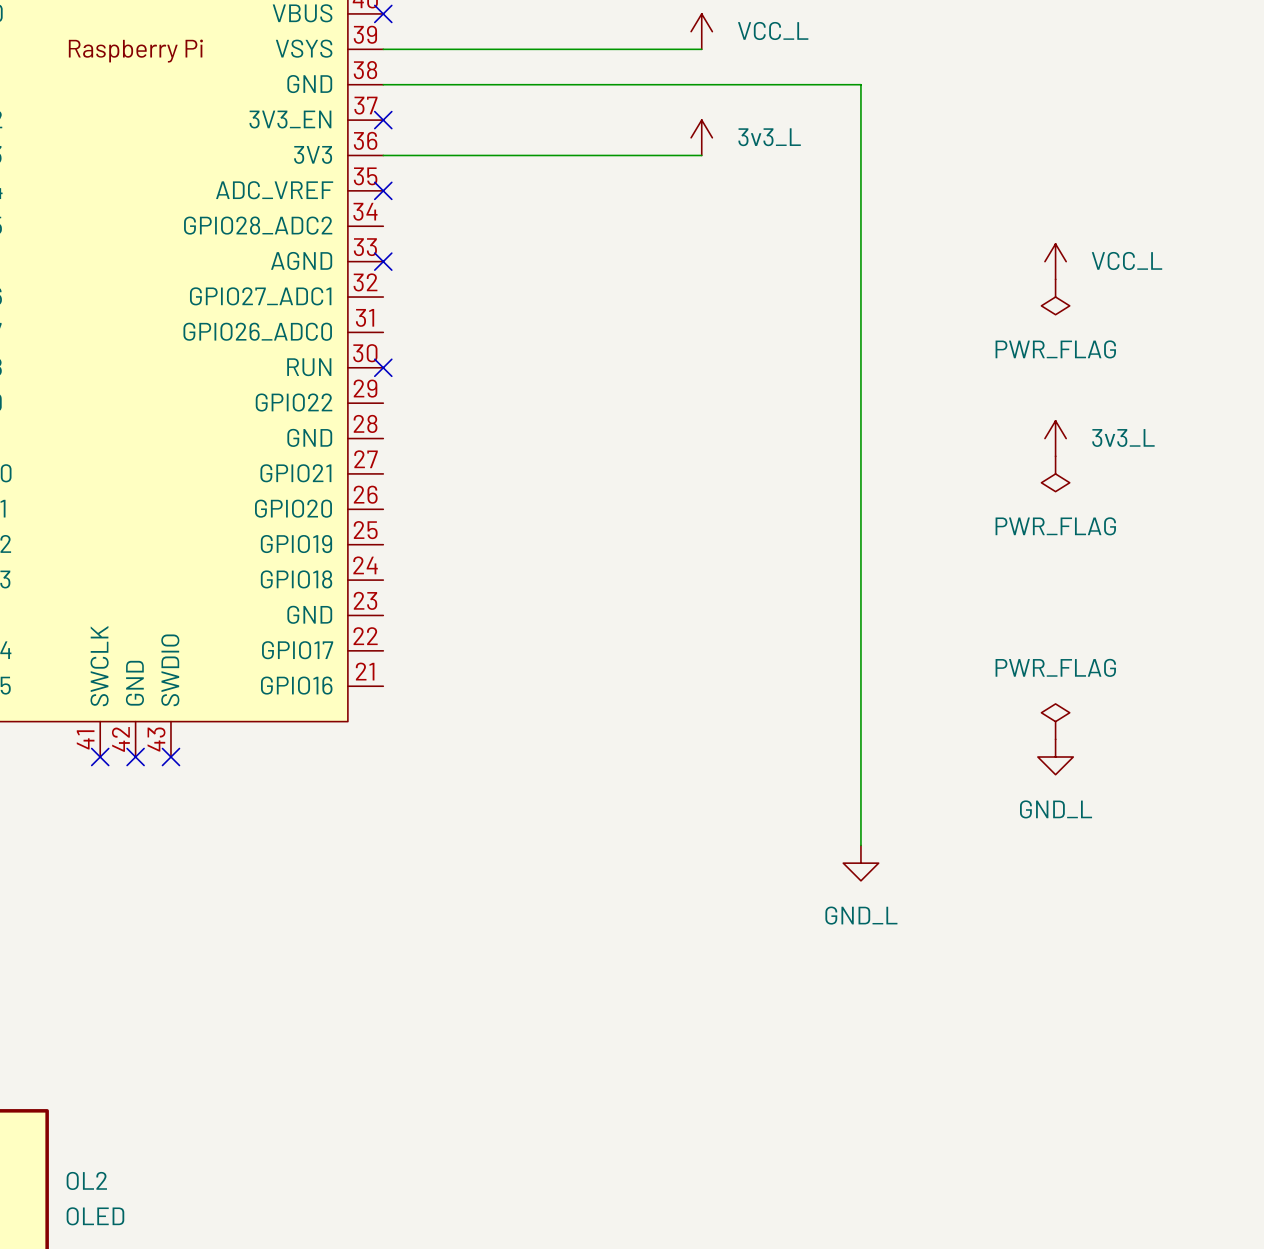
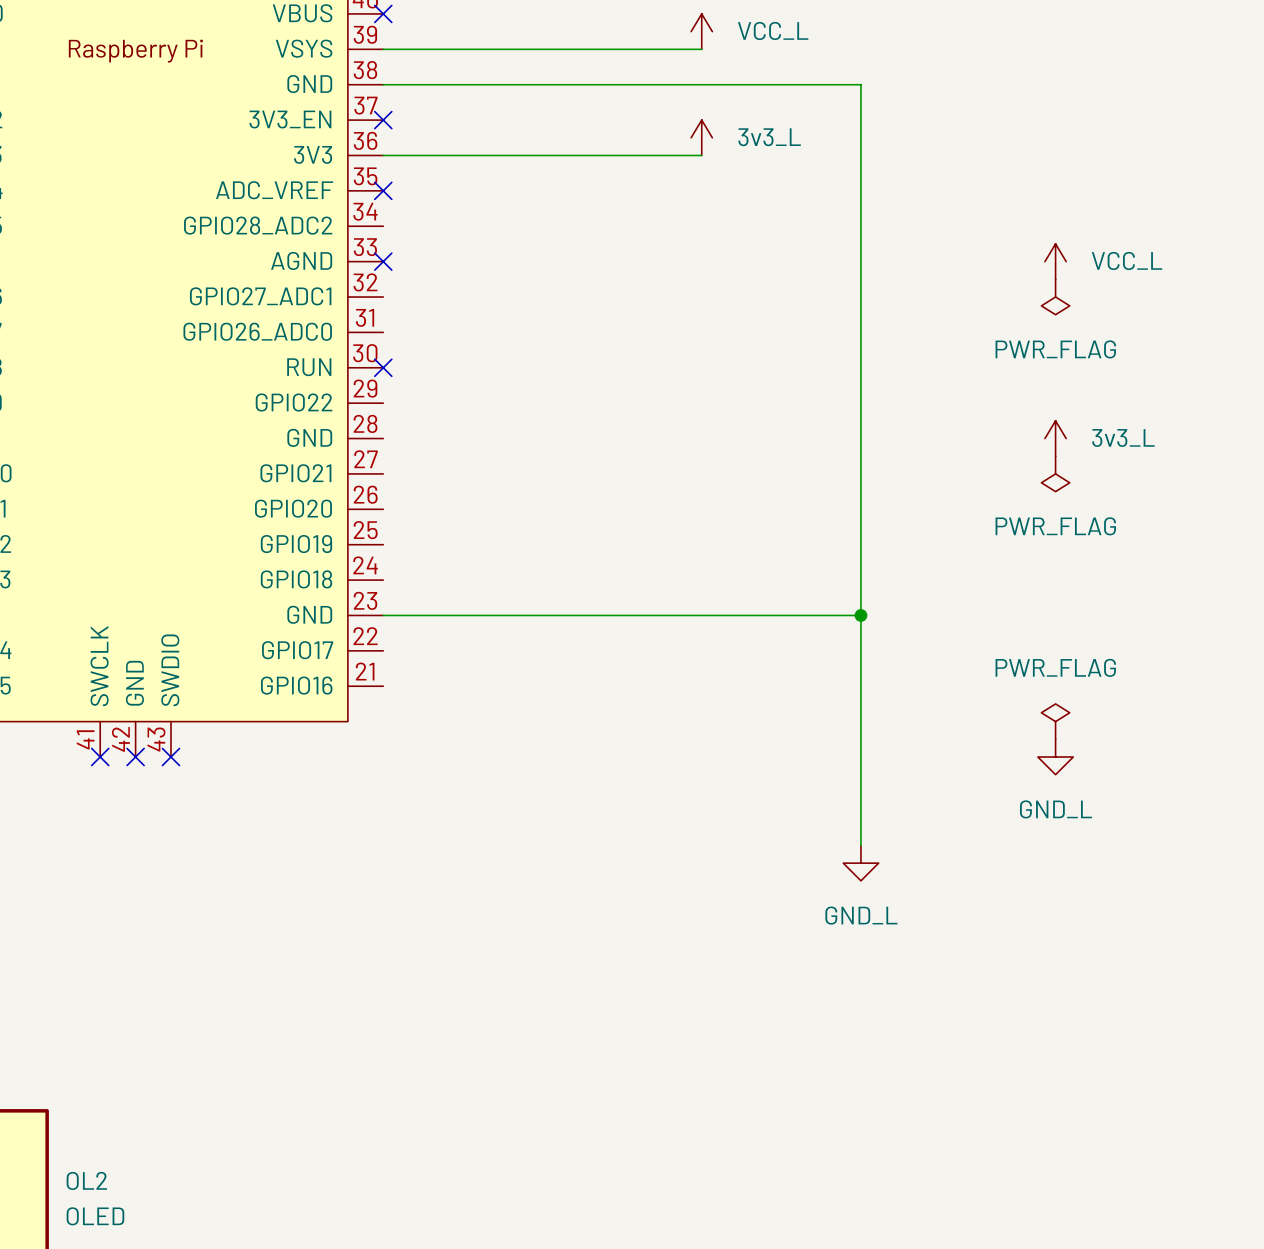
wire: none -> (383, 615) (860, 615)
junction: none -> (860, 615)

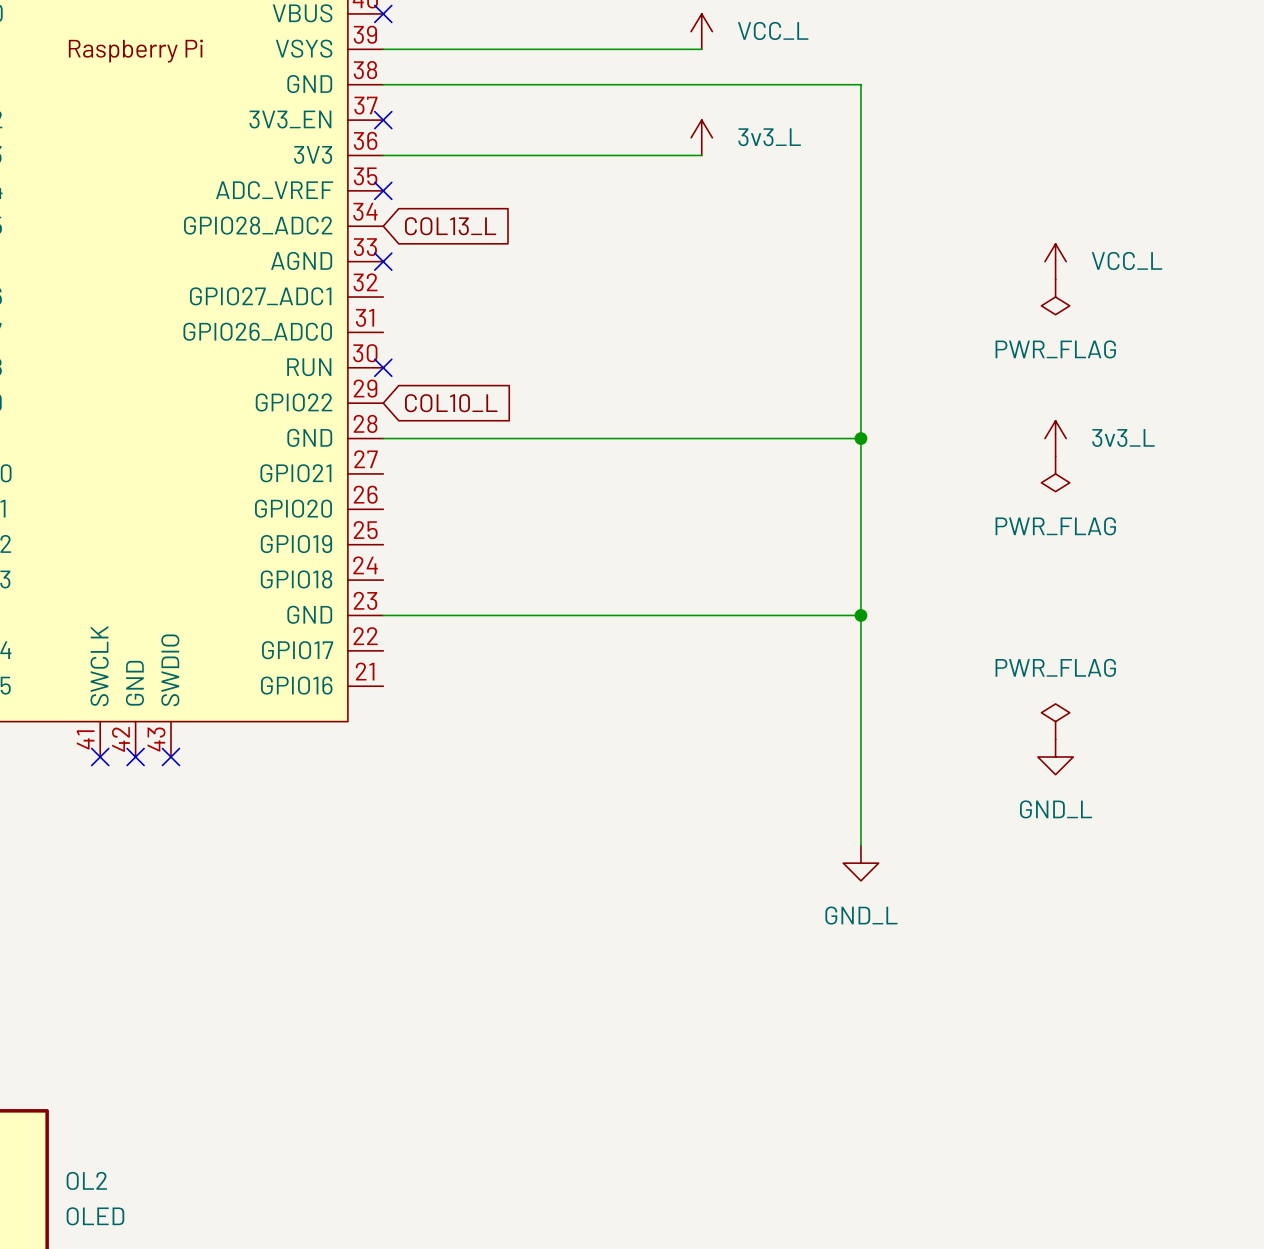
global label: none -> COL13_L (450, 226)
global label: none -> COL10_L (451, 403)
wire: none -> (383, 438) (860, 438)
junction: none -> (860, 438)

